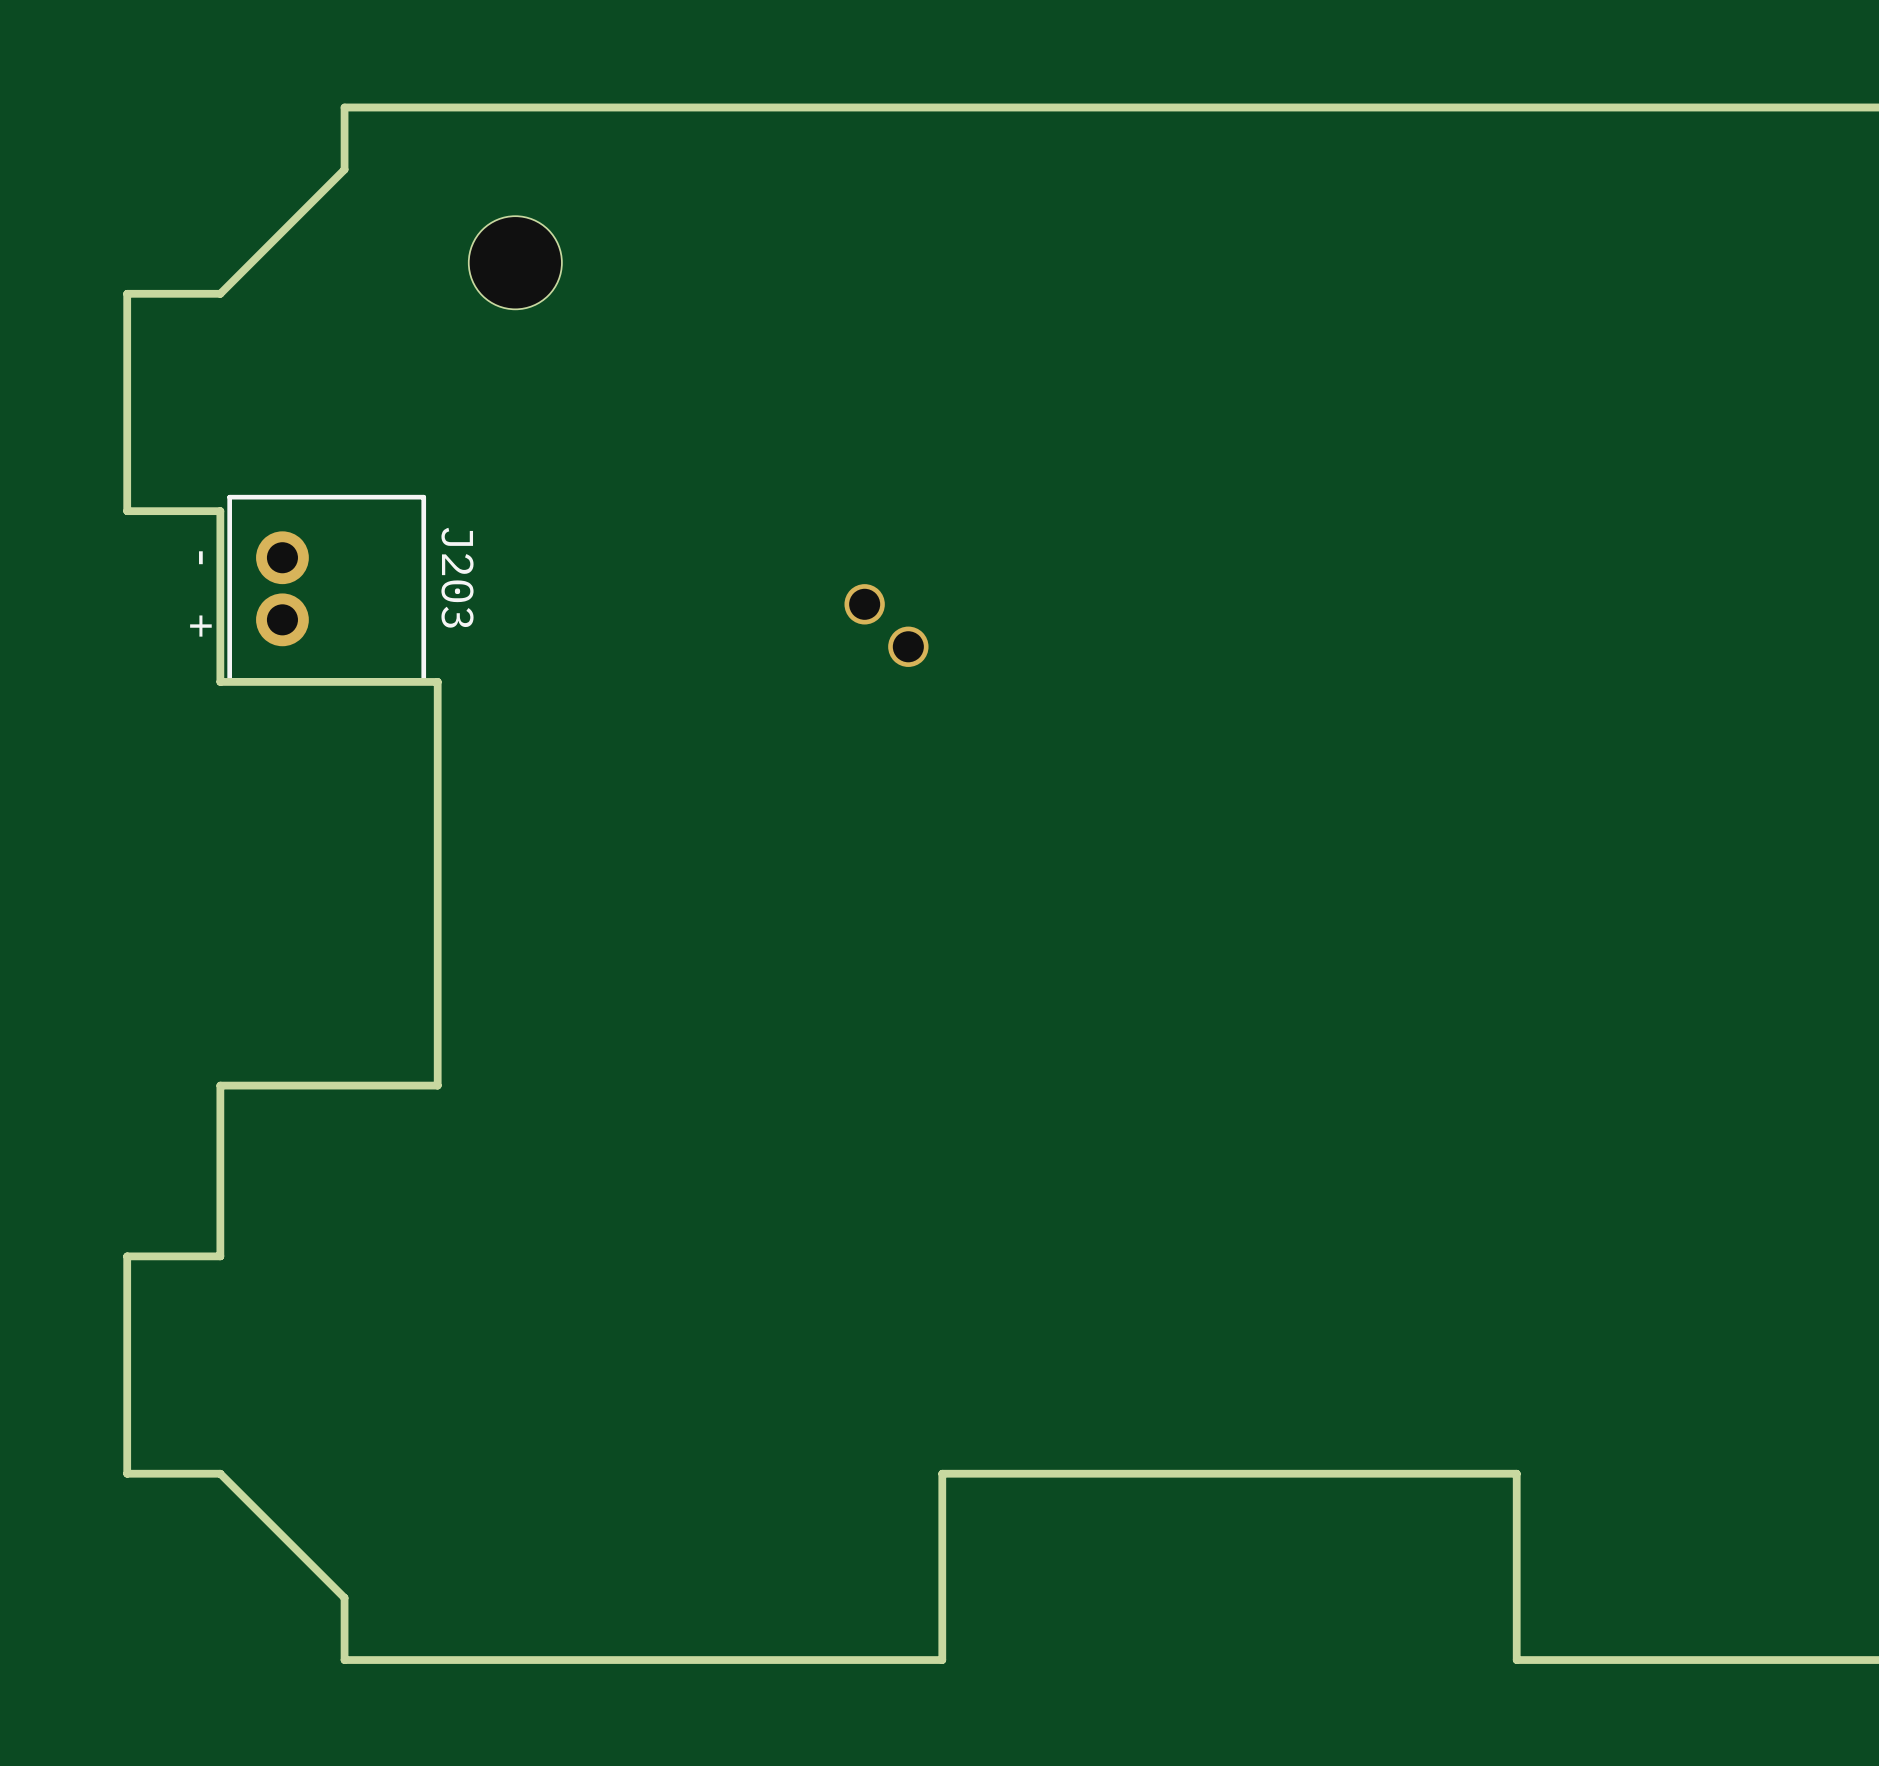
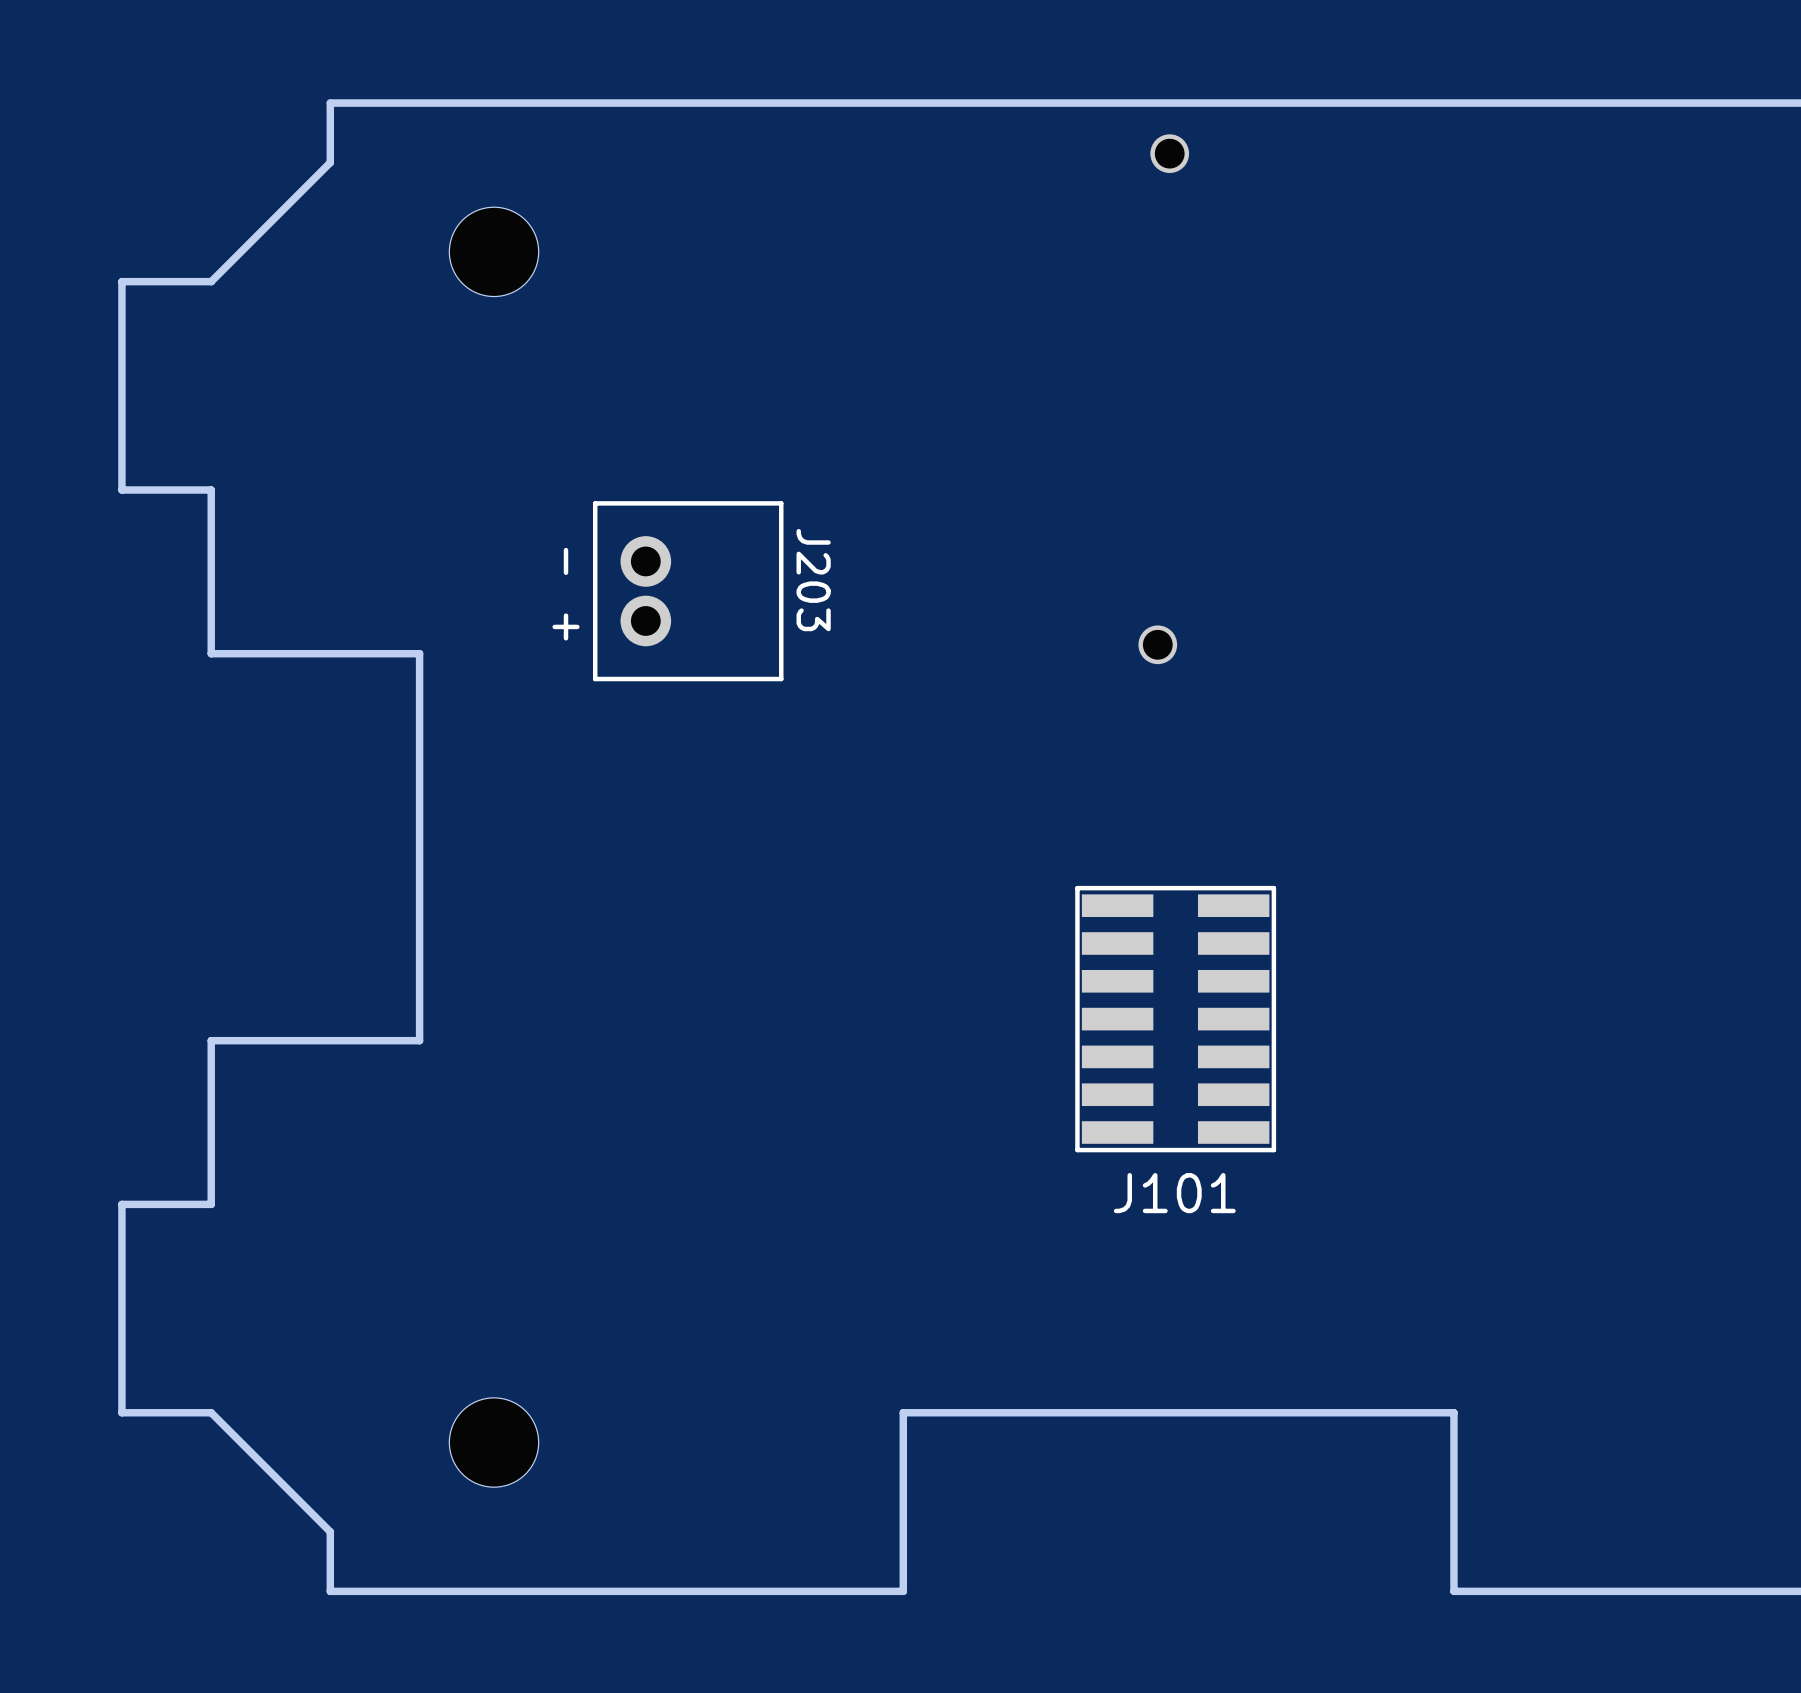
part: none -> (1169, 153)
J203 position: (326, 588) -> (688, 591)
part: (864, 604) -> none
part: (908, 646) -> none
part: none -> (1157, 644)
J101: none -> (1175, 1019)
part: none -> (494, 1442)

